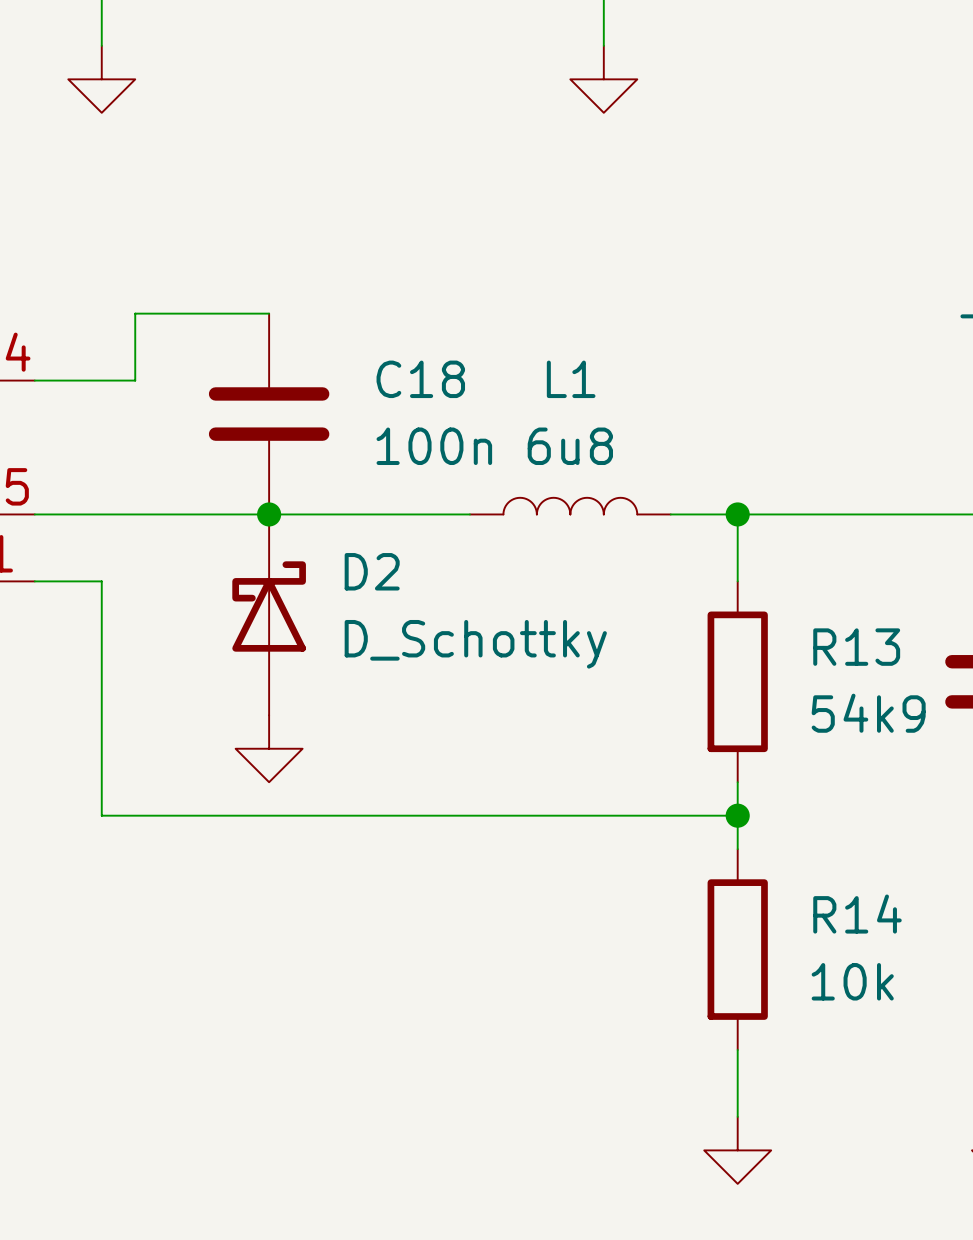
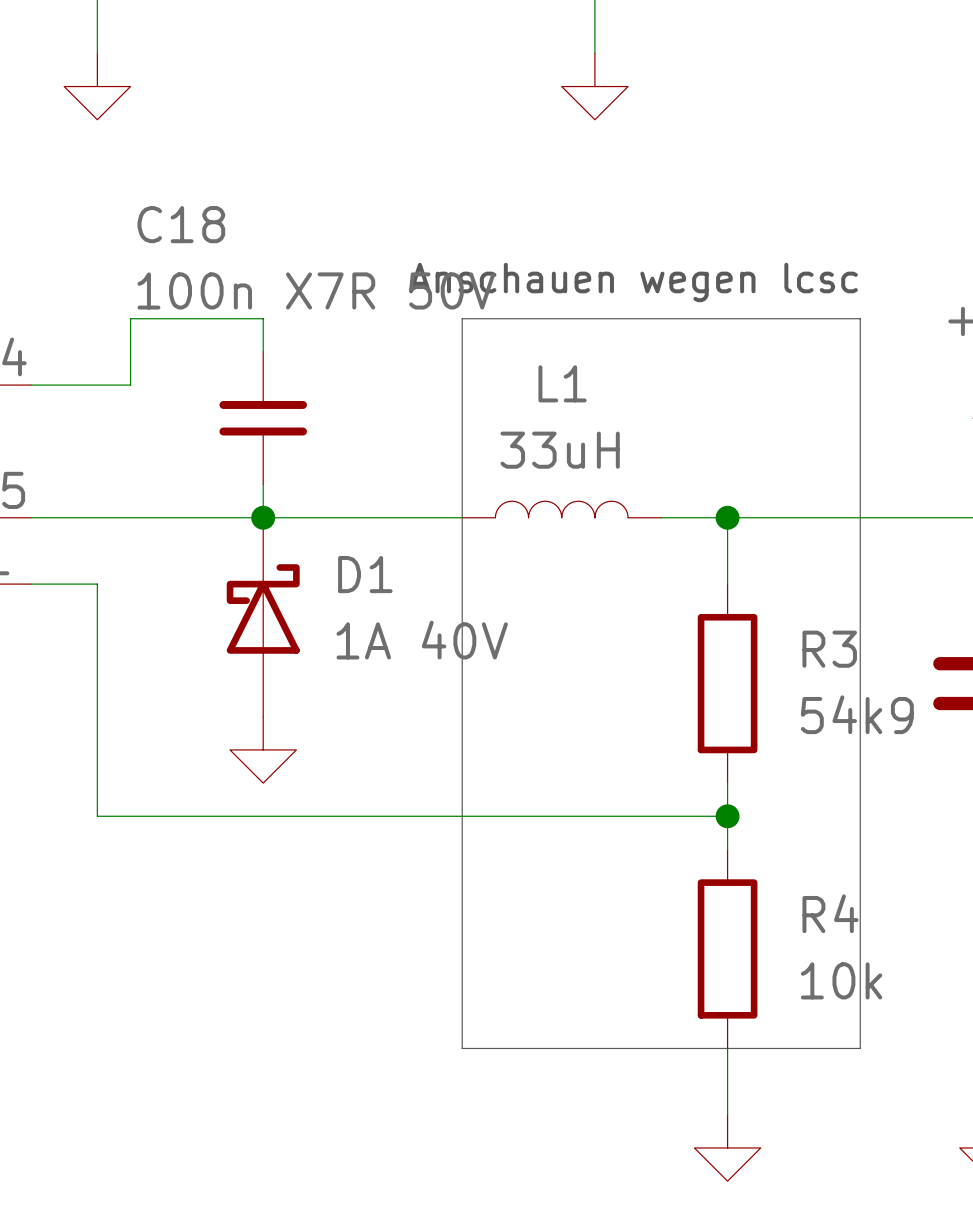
text: none -> Anschauen wegen lcsc (633, 282)
C18 symbol: [208, 313, 330, 515] -> [219, 351, 308, 485]
line: none -> (462, 318) (860, 318) (860, 1048) (462, 1048) (462, 318)
C18 name position: C18 (420, 379) -> C18 (181, 224)
C18 value: 100n (434, 446) -> 100n X7R 50V (316, 290)
L1 value: 6u8 (570, 446) -> 33uH (560, 450)
D2 name: D2 (372, 571) -> D1 (365, 574)
D2 value: D_Schottky (475, 644) -> 1A 40V (422, 640)
R13 name: R13 (856, 647) -> R3 (829, 649)
R14 name: R14 (857, 914) -> R4 (830, 913)

